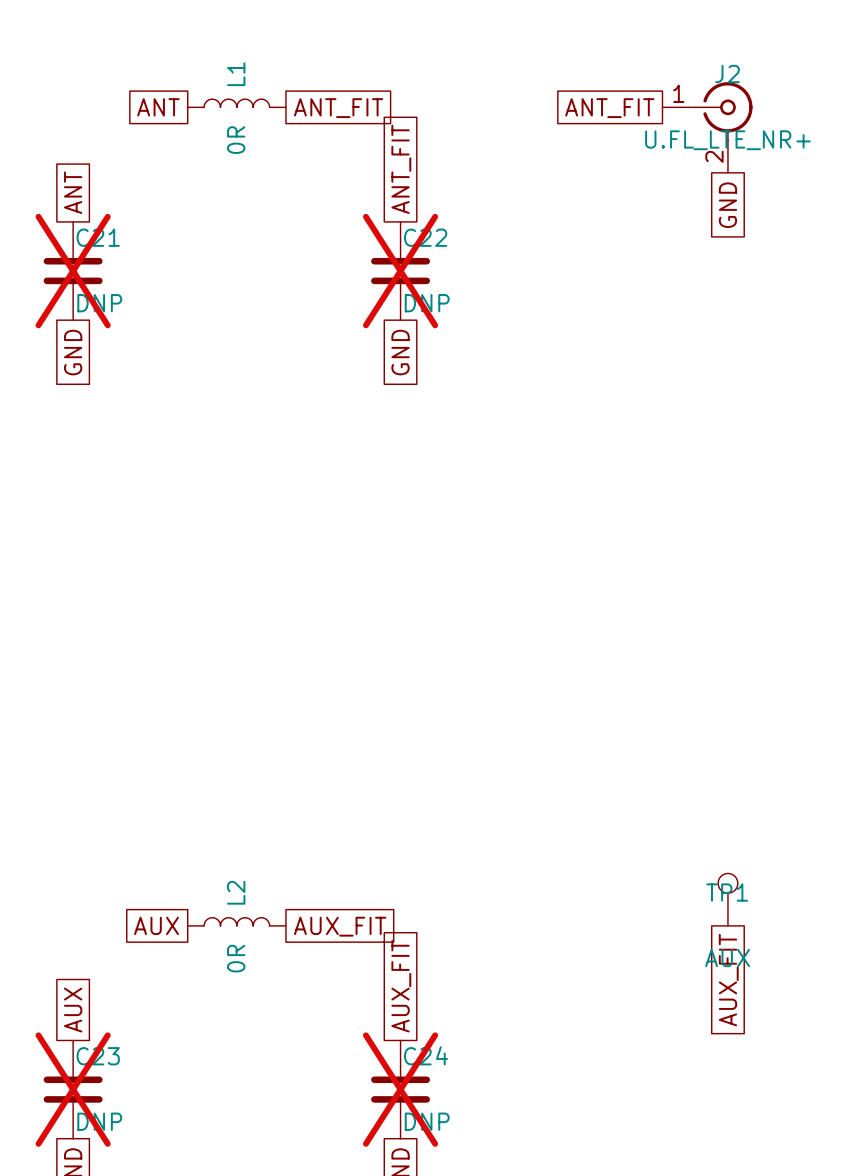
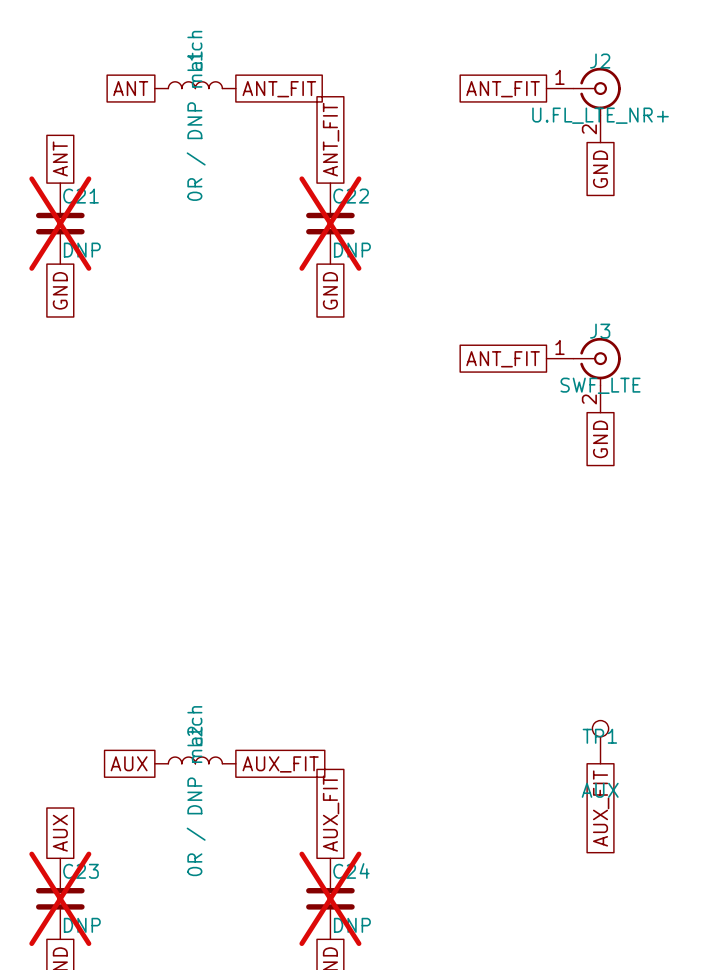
L1 value: 0R (236, 140) -> 0R / DNP match (196, 115)
global label: none -> ANT_FIT (503, 359)
J3: none -> SWF_LTE (583, 375)
global label: none -> GND (600, 439)
L2 value: 0R (236, 958) -> 0R / DNP match (196, 791)

